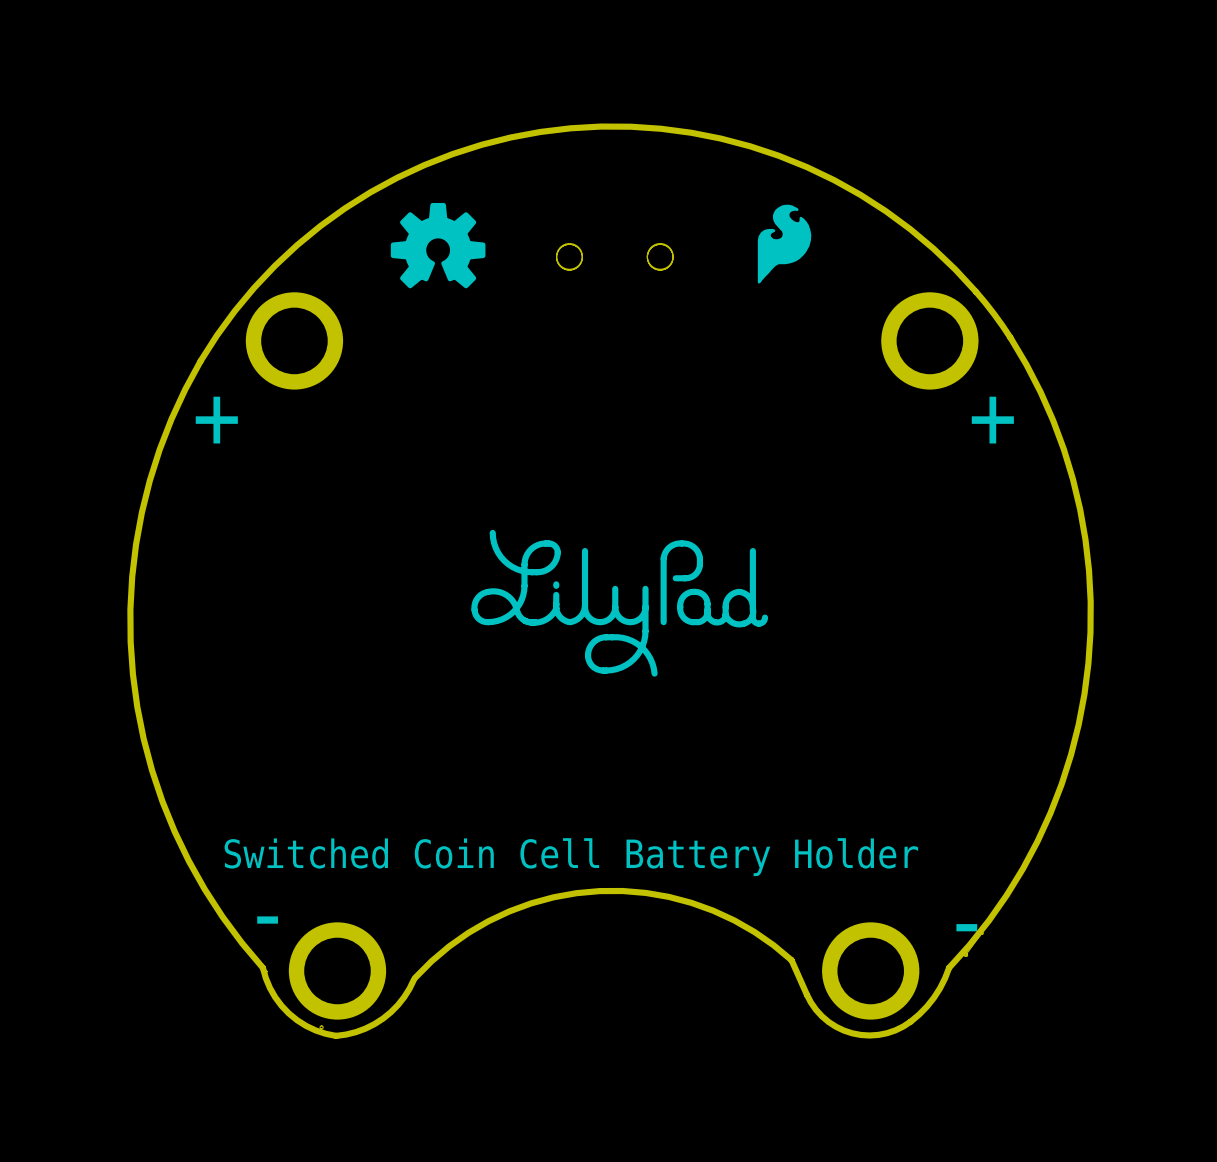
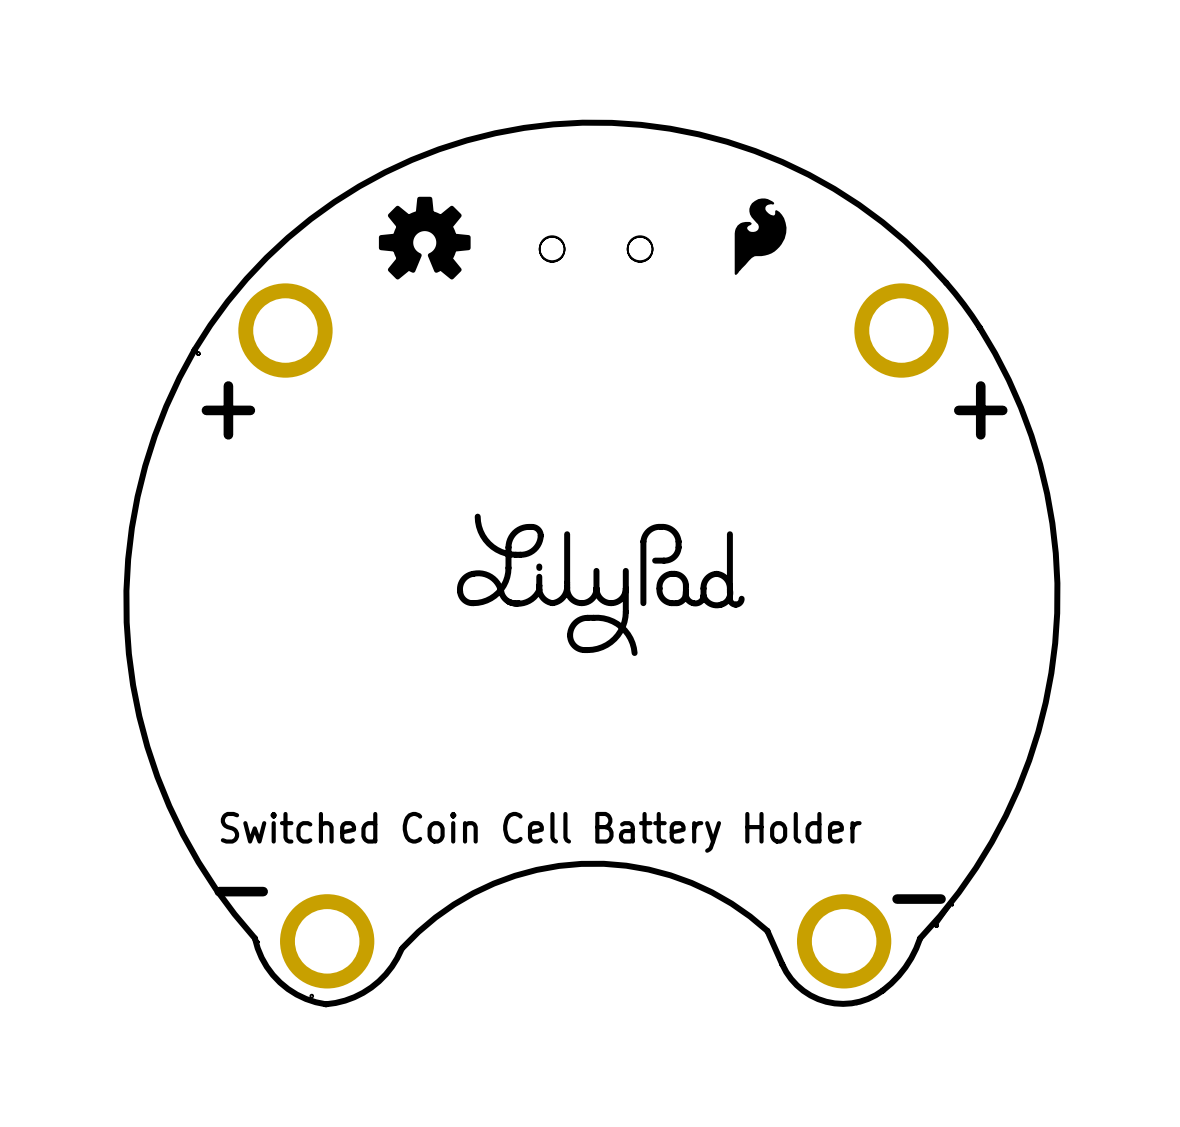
board edge: none -> (197, 352) (199, 354)
board edge: none -> (197, 352) (199, 354)
board edge: none -> (197, 352) (199, 354)
board edge: none -> (197, 352) (199, 354)

